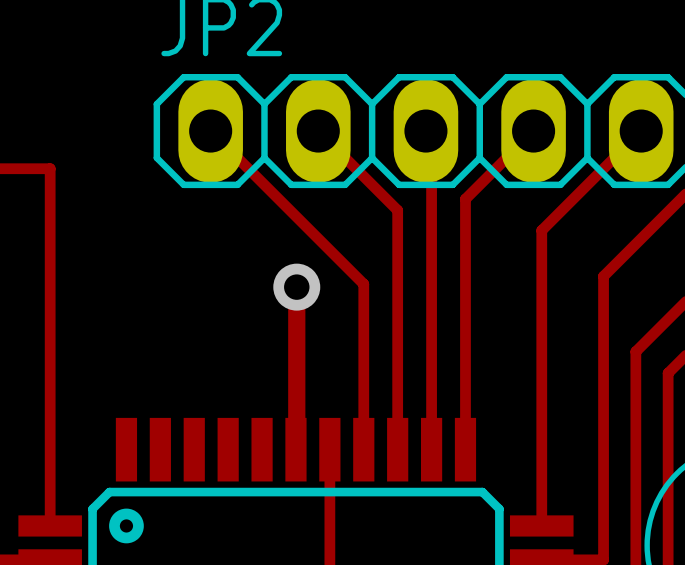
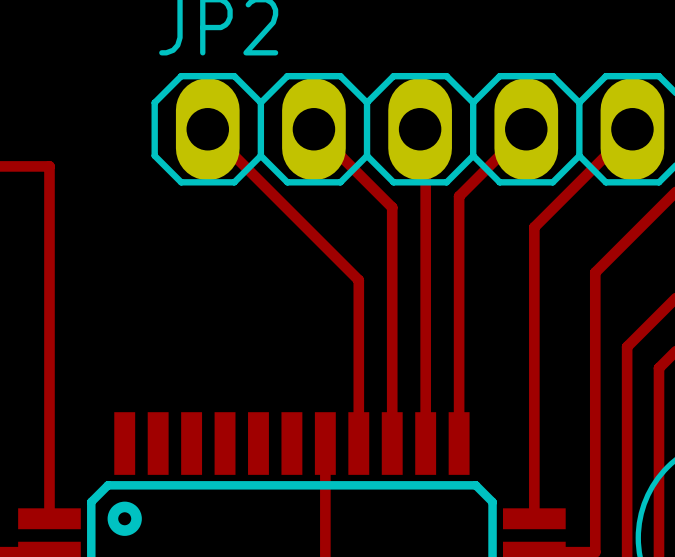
track: (296, 287) (296, 449) -> none
via: (296, 287) -> none

